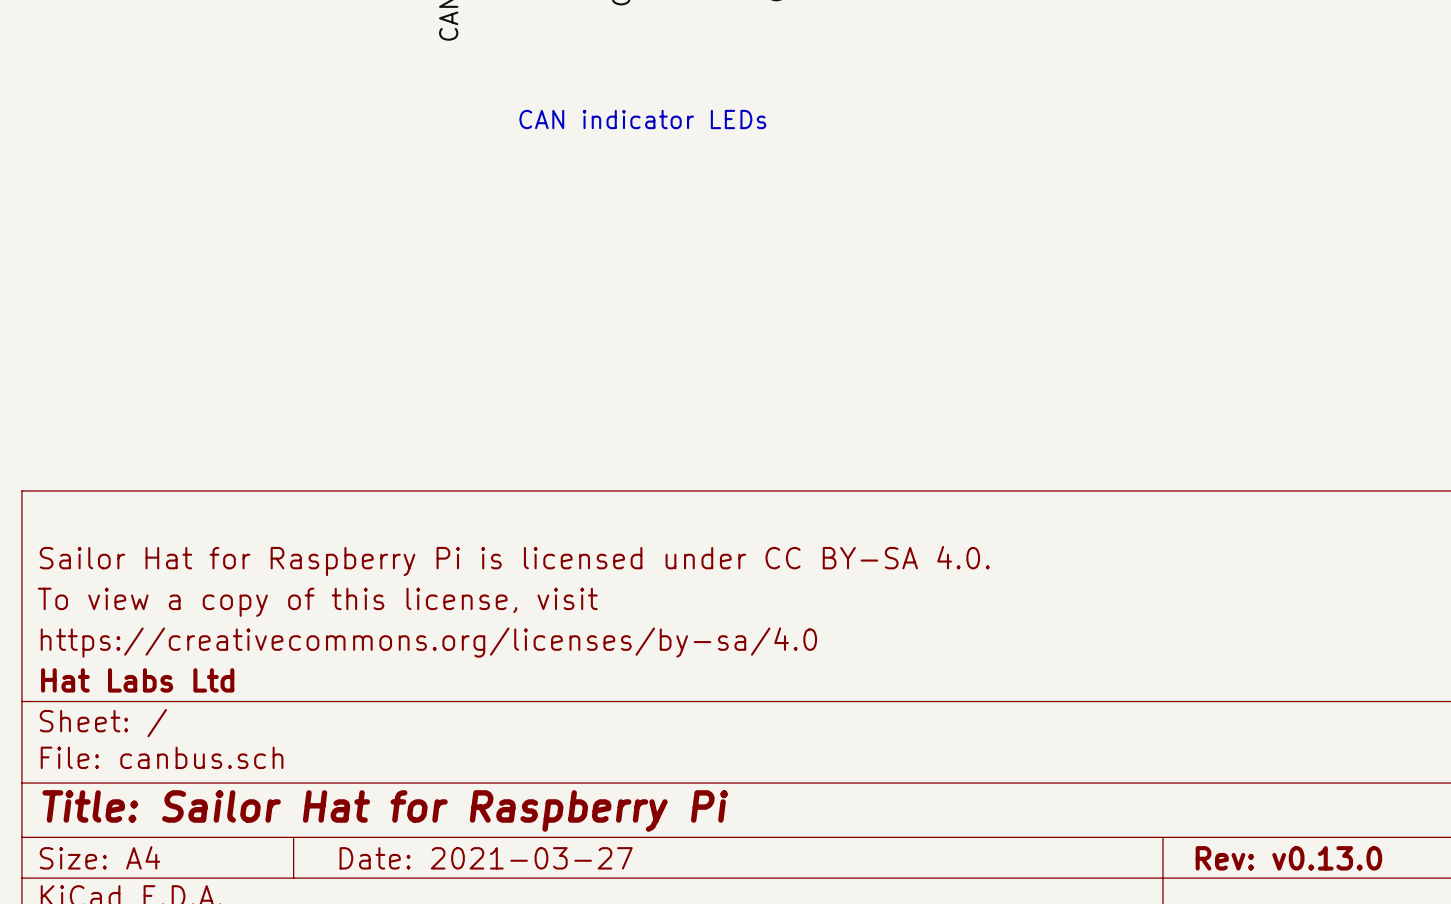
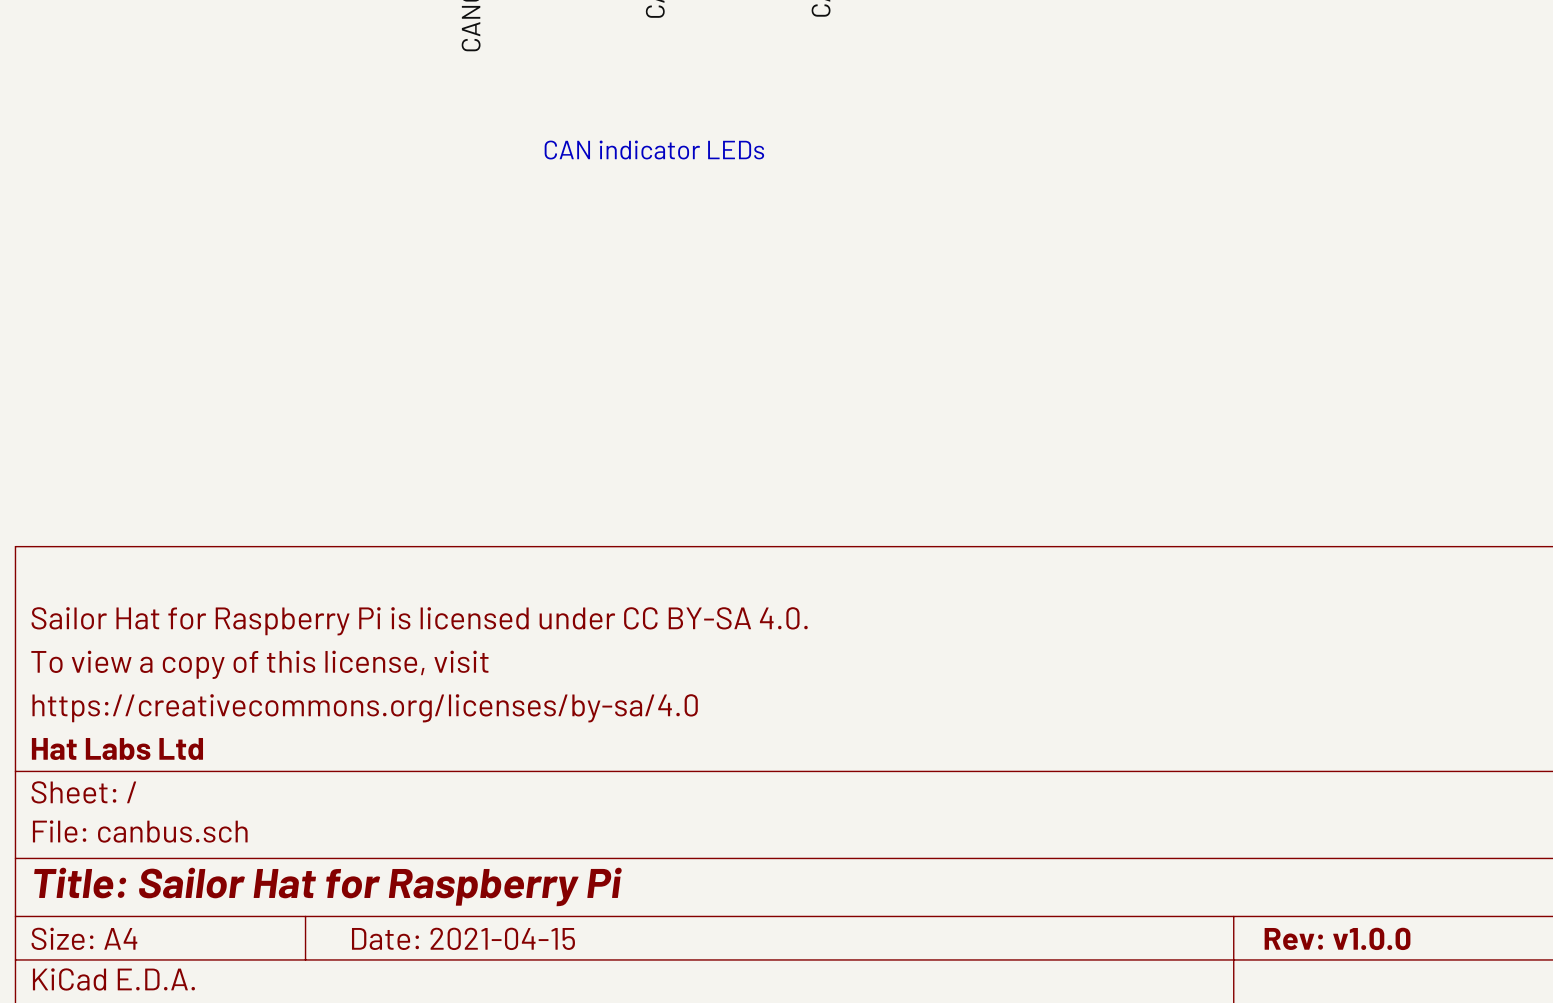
title block: Date: 2021-03-27 (486, 858) -> Date: 2021-04-15 (463, 938)
title block: Rev: v0.13.0 (1288, 858) -> Rev: v1.0.0 (1337, 938)

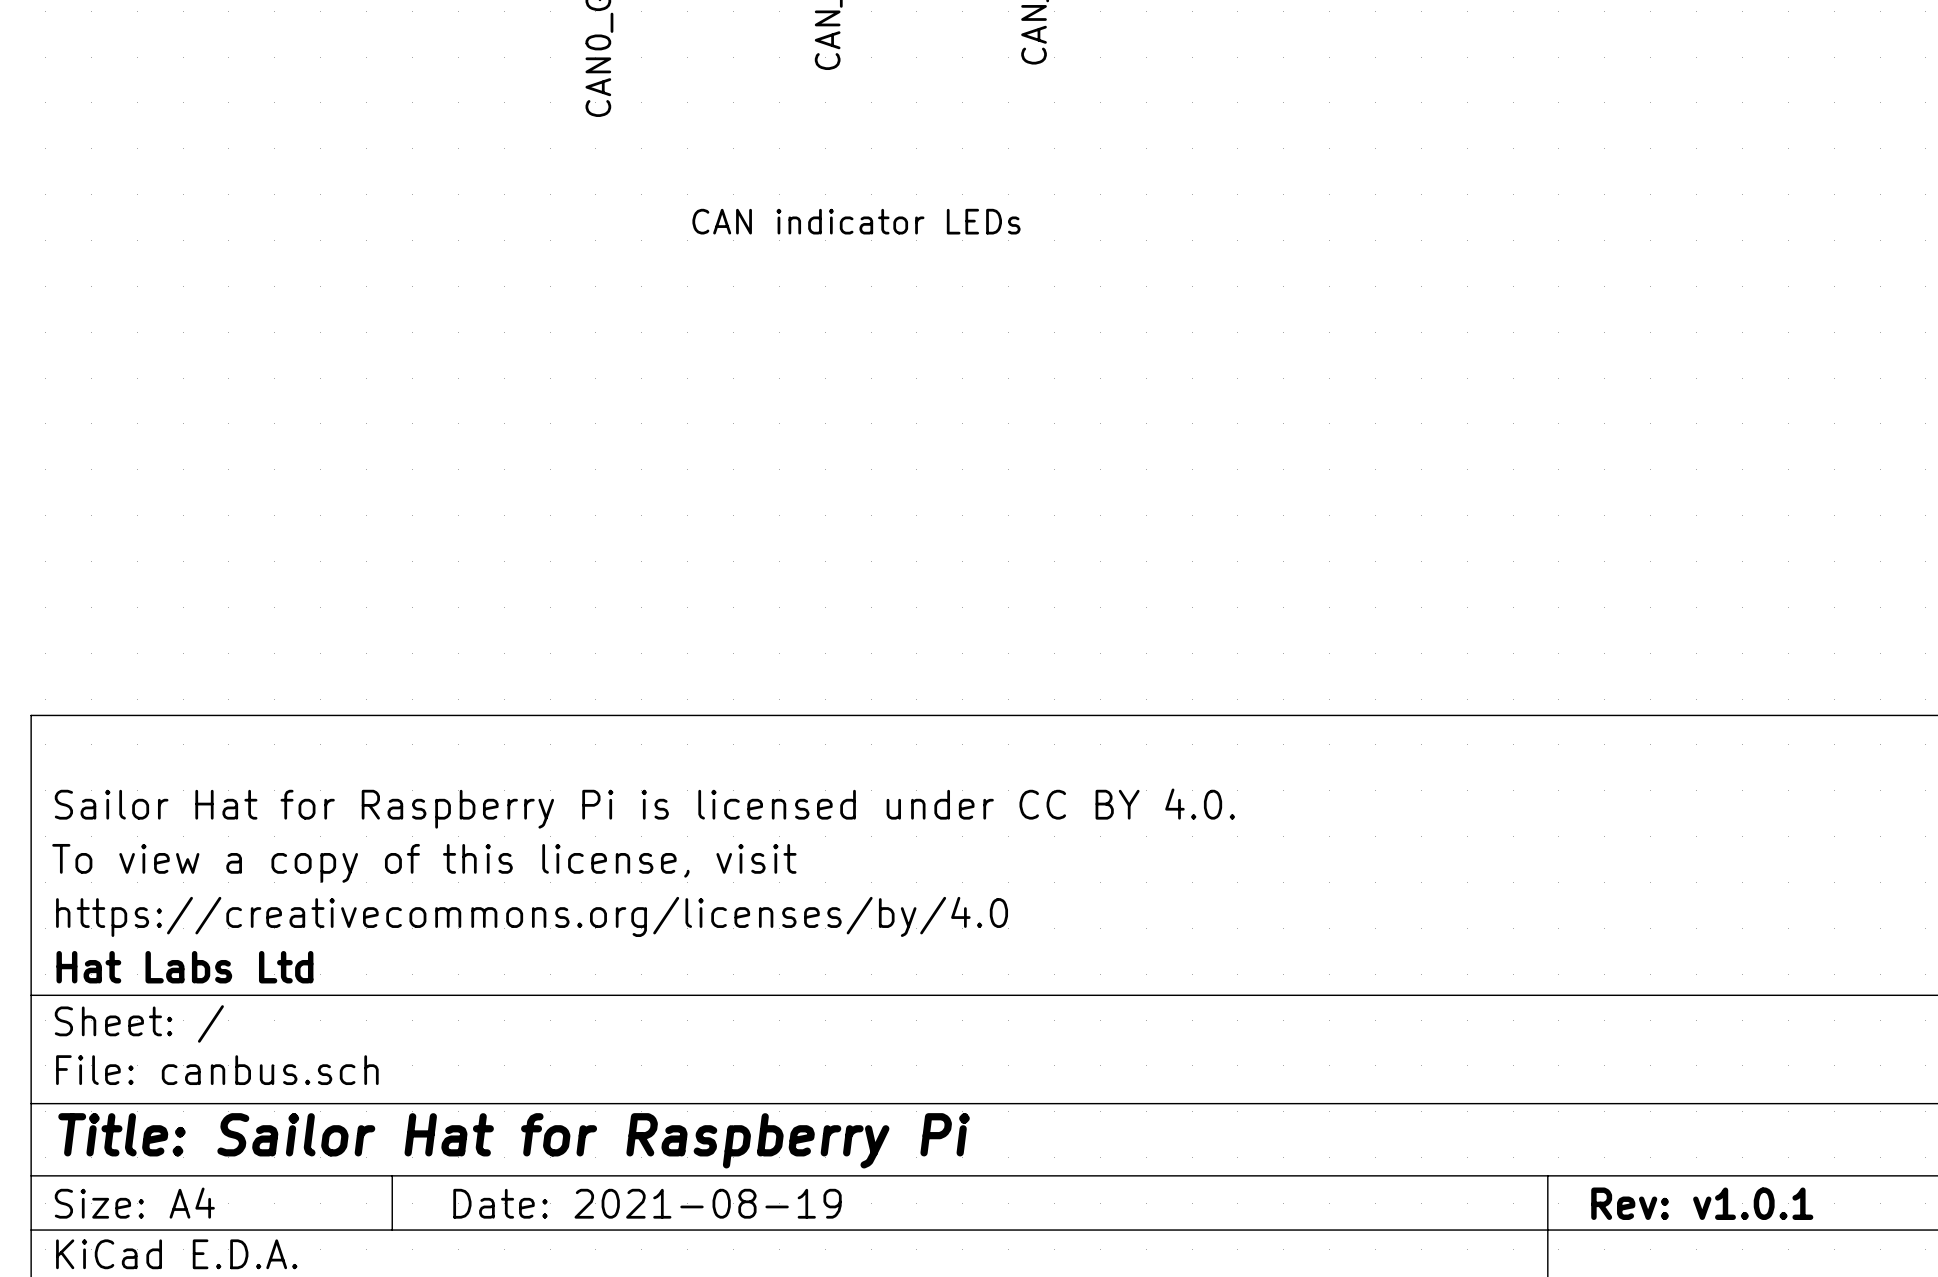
title block: Sailor Hat for Raspberry Pi is licensed under CC BY-SA 4.0. (419, 621) -> Sailor Hat for Raspberry Pi is licensed under CC BY 4.0. (644, 808)
title block: https://creativecommons.org/licenses/by-sa/4.0 (365, 708) -> https://creativecommons.org/licenses/by/4.0 (532, 916)
title block: Date: 2021-04-15 (463, 938) -> Date: 2021-08-19 (647, 1203)
title block: Rev: v1.0.0 (1337, 938) -> Rev: v1.0.1 (1702, 1203)

